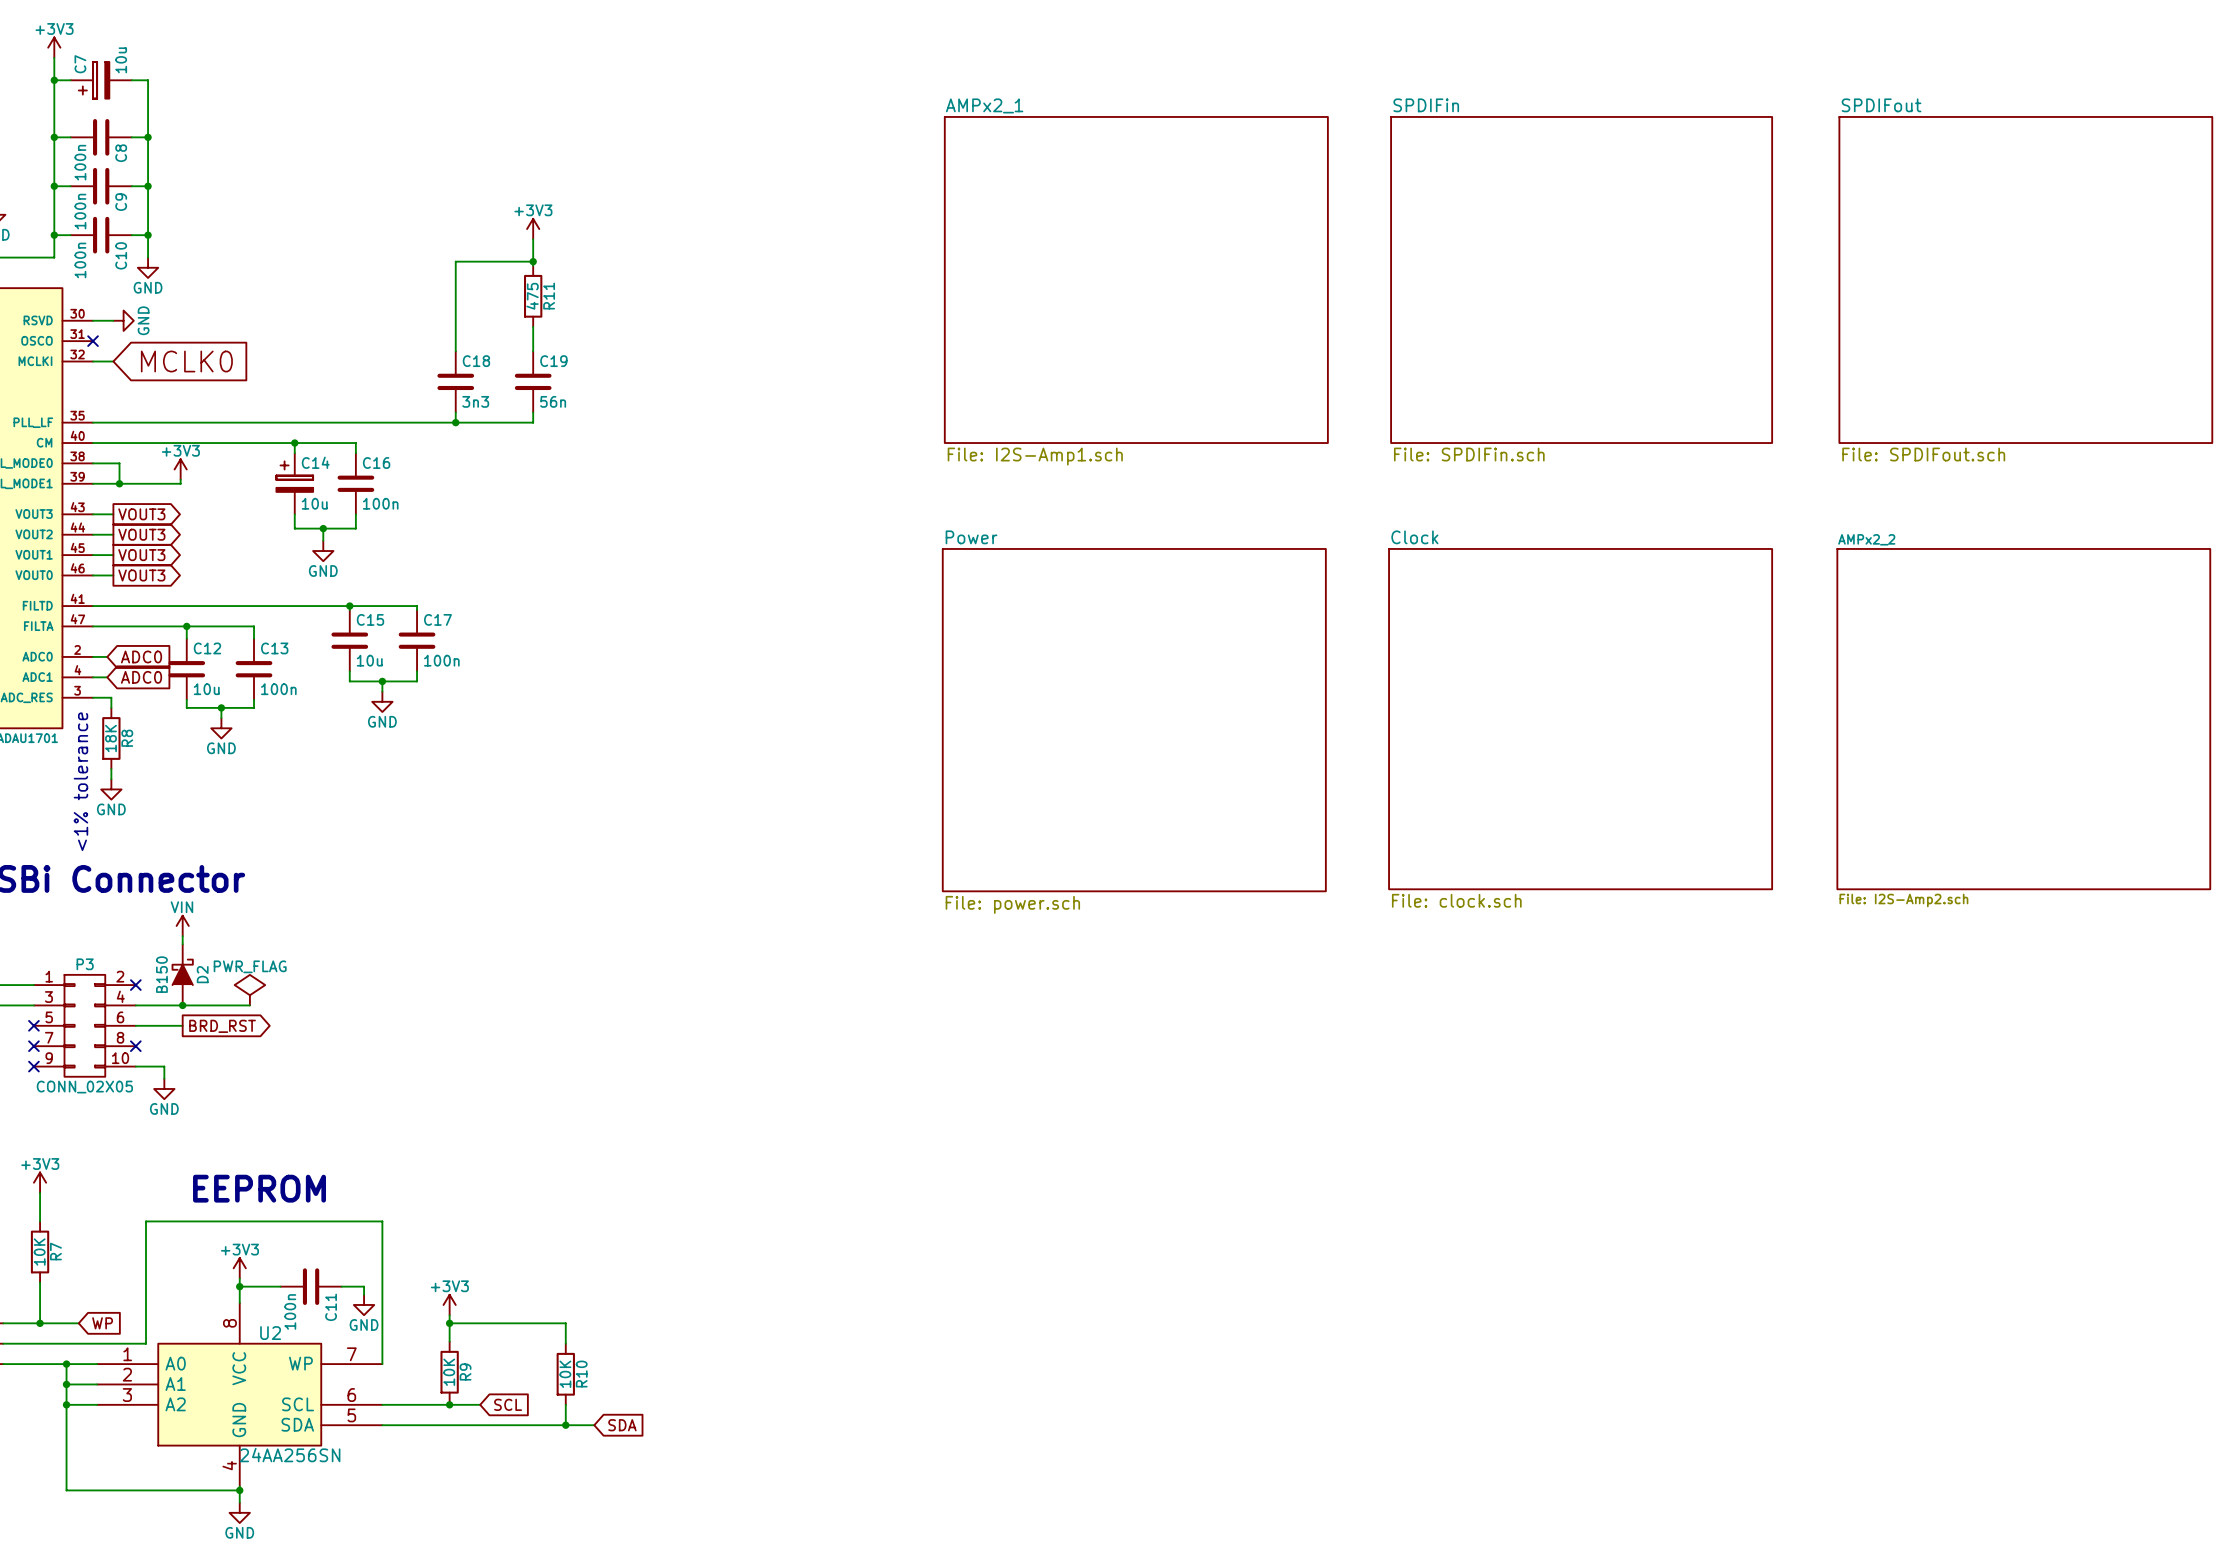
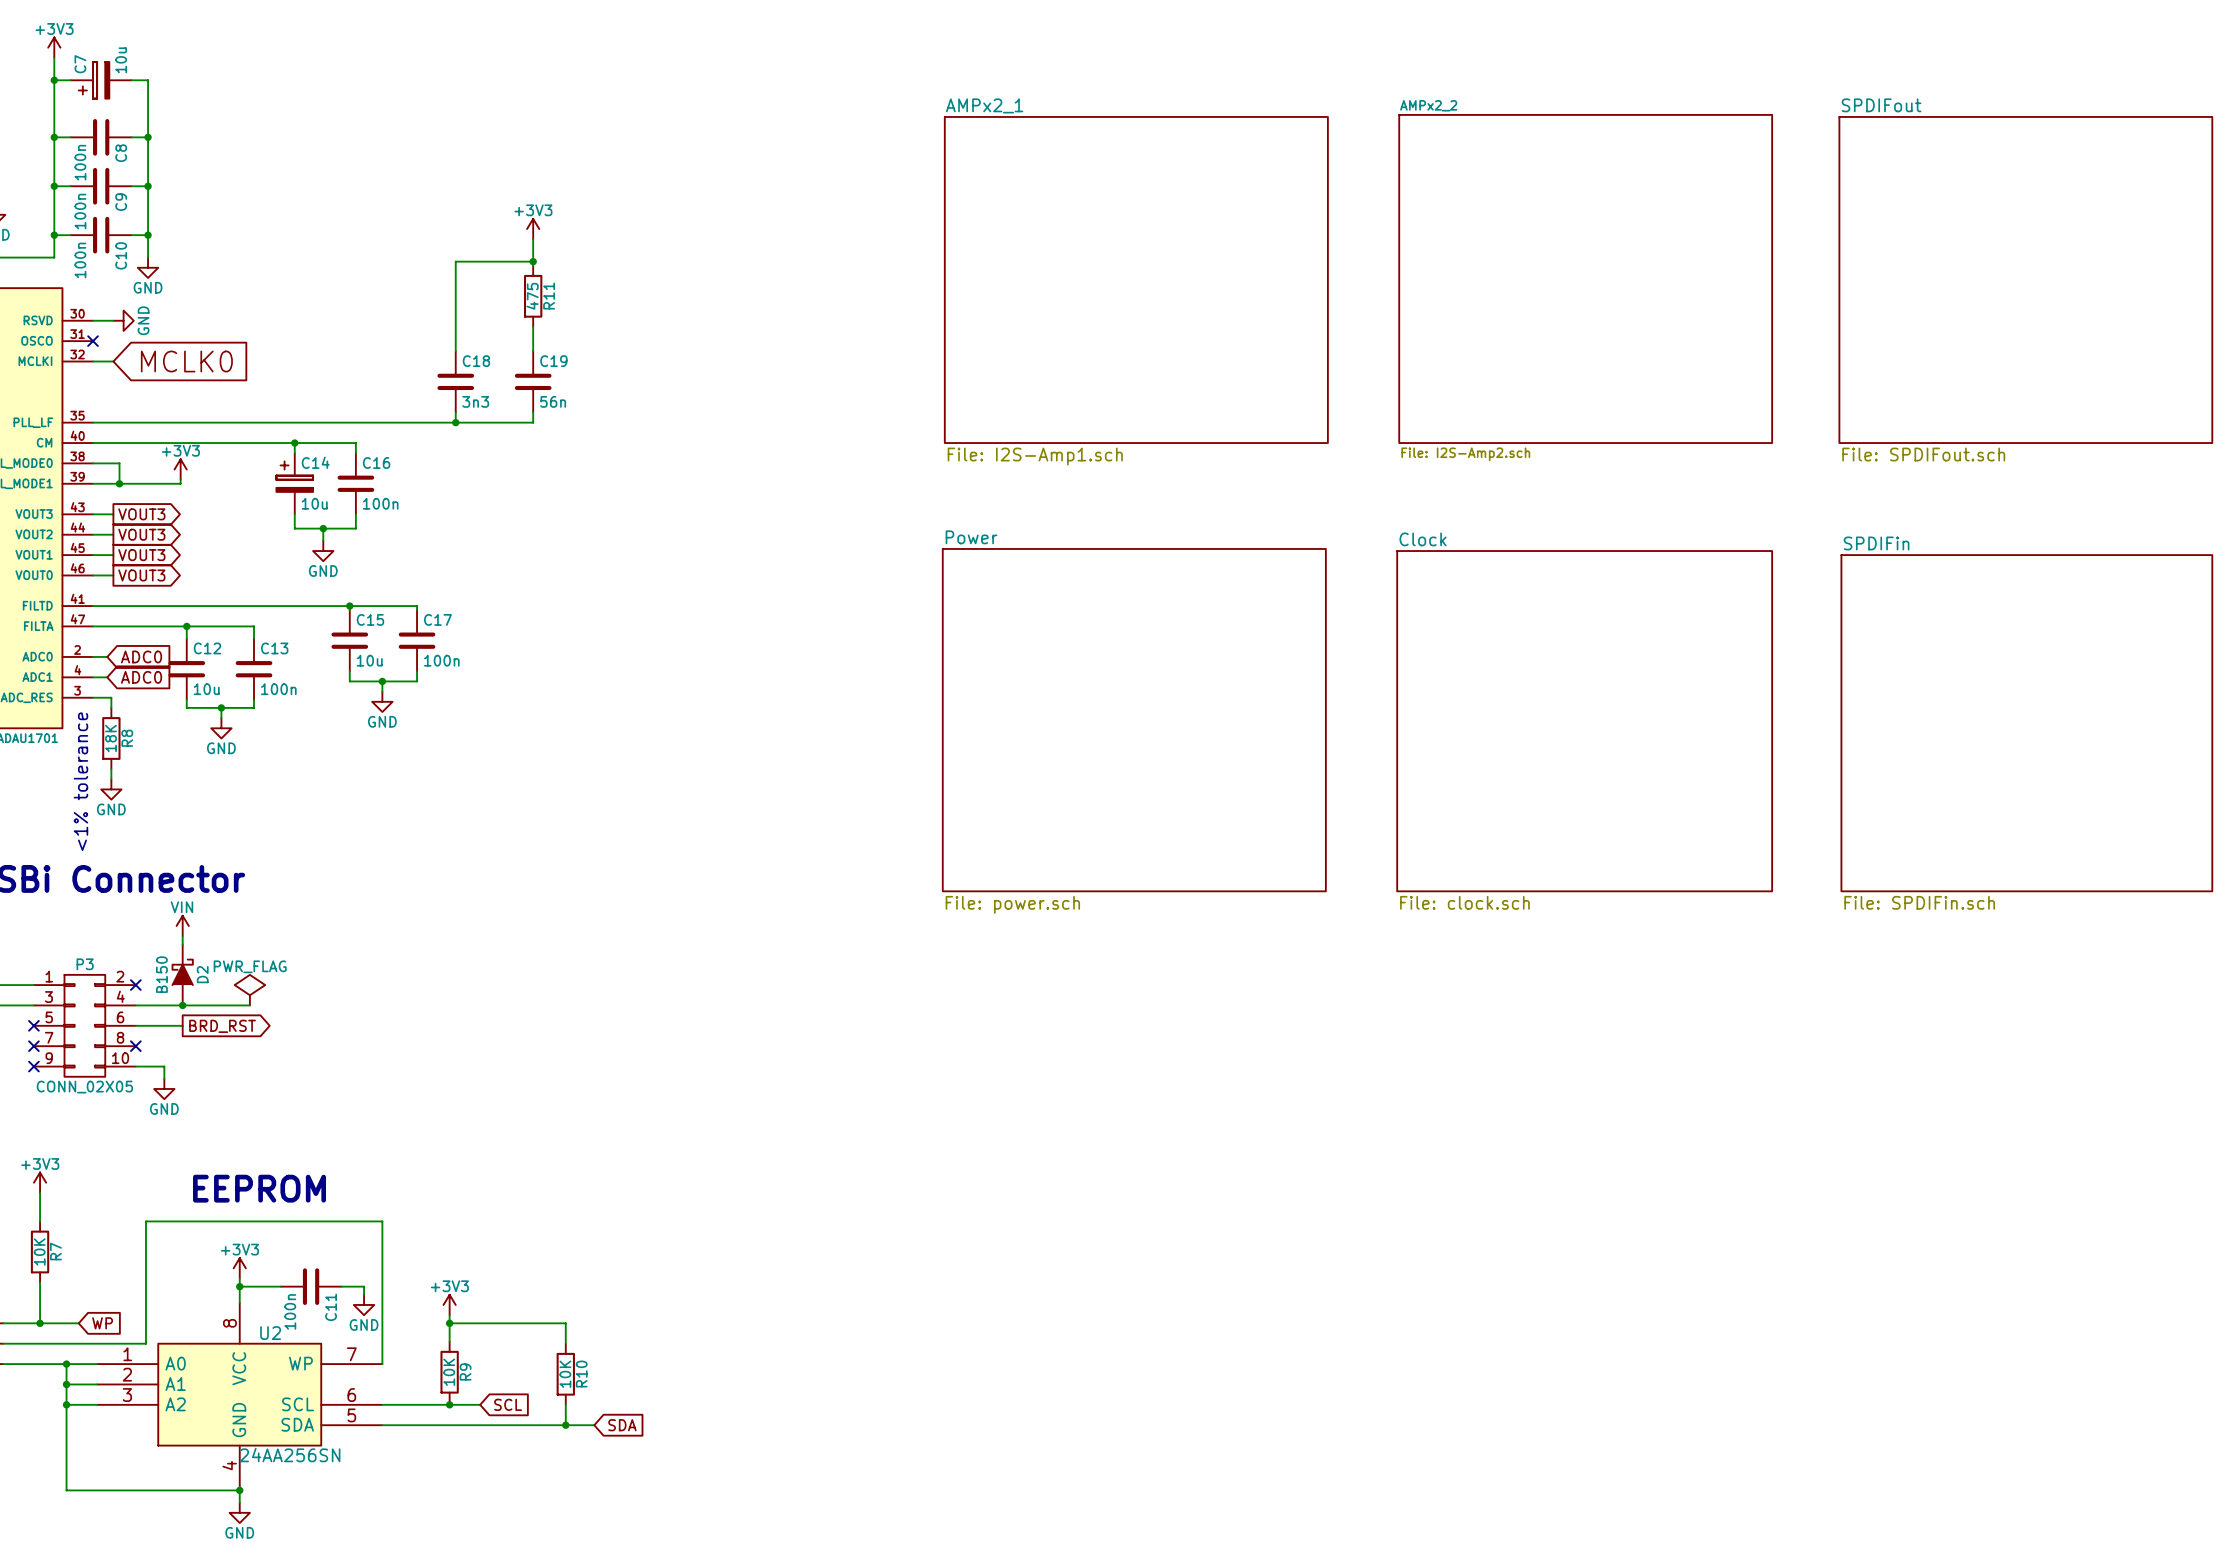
sheet SPDIFin: File: SPDIFin.sch (1581, 279) -> none
sheet Clock shape: [1389, 548, 1773, 890] -> [1397, 551, 1773, 892]
sheet AMPx2_2 shape: [1837, 548, 2211, 890] -> [1399, 114, 1773, 444]
sheet SPDIFin: none -> File: SPDIFin.sch (2026, 723)

